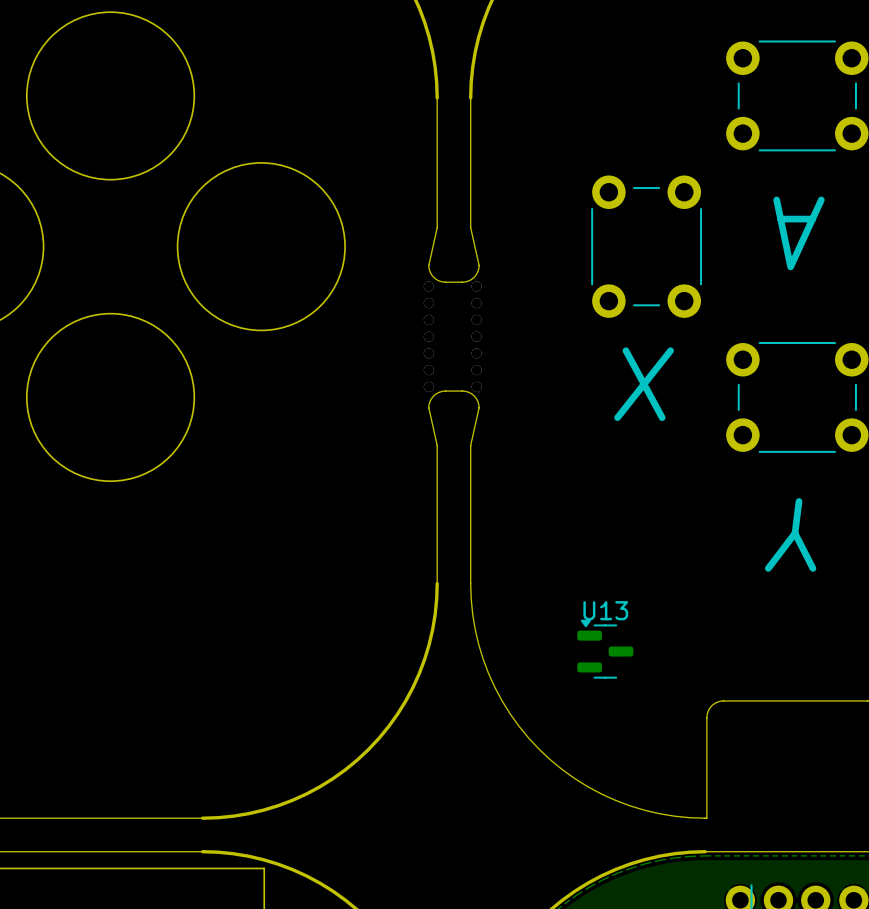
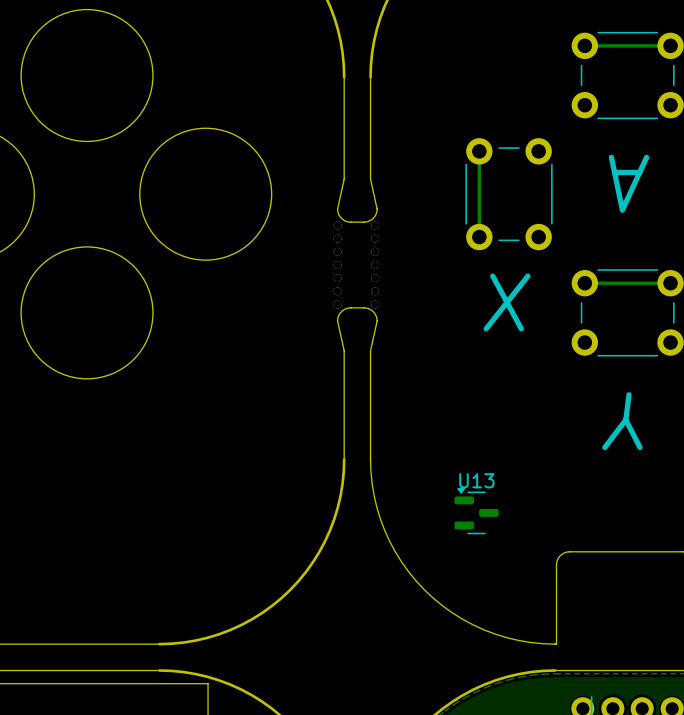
track: none -> (670, 45) (584, 45)
track: none -> (479, 151) (479, 237)
track: none -> (670, 283) (584, 283)

